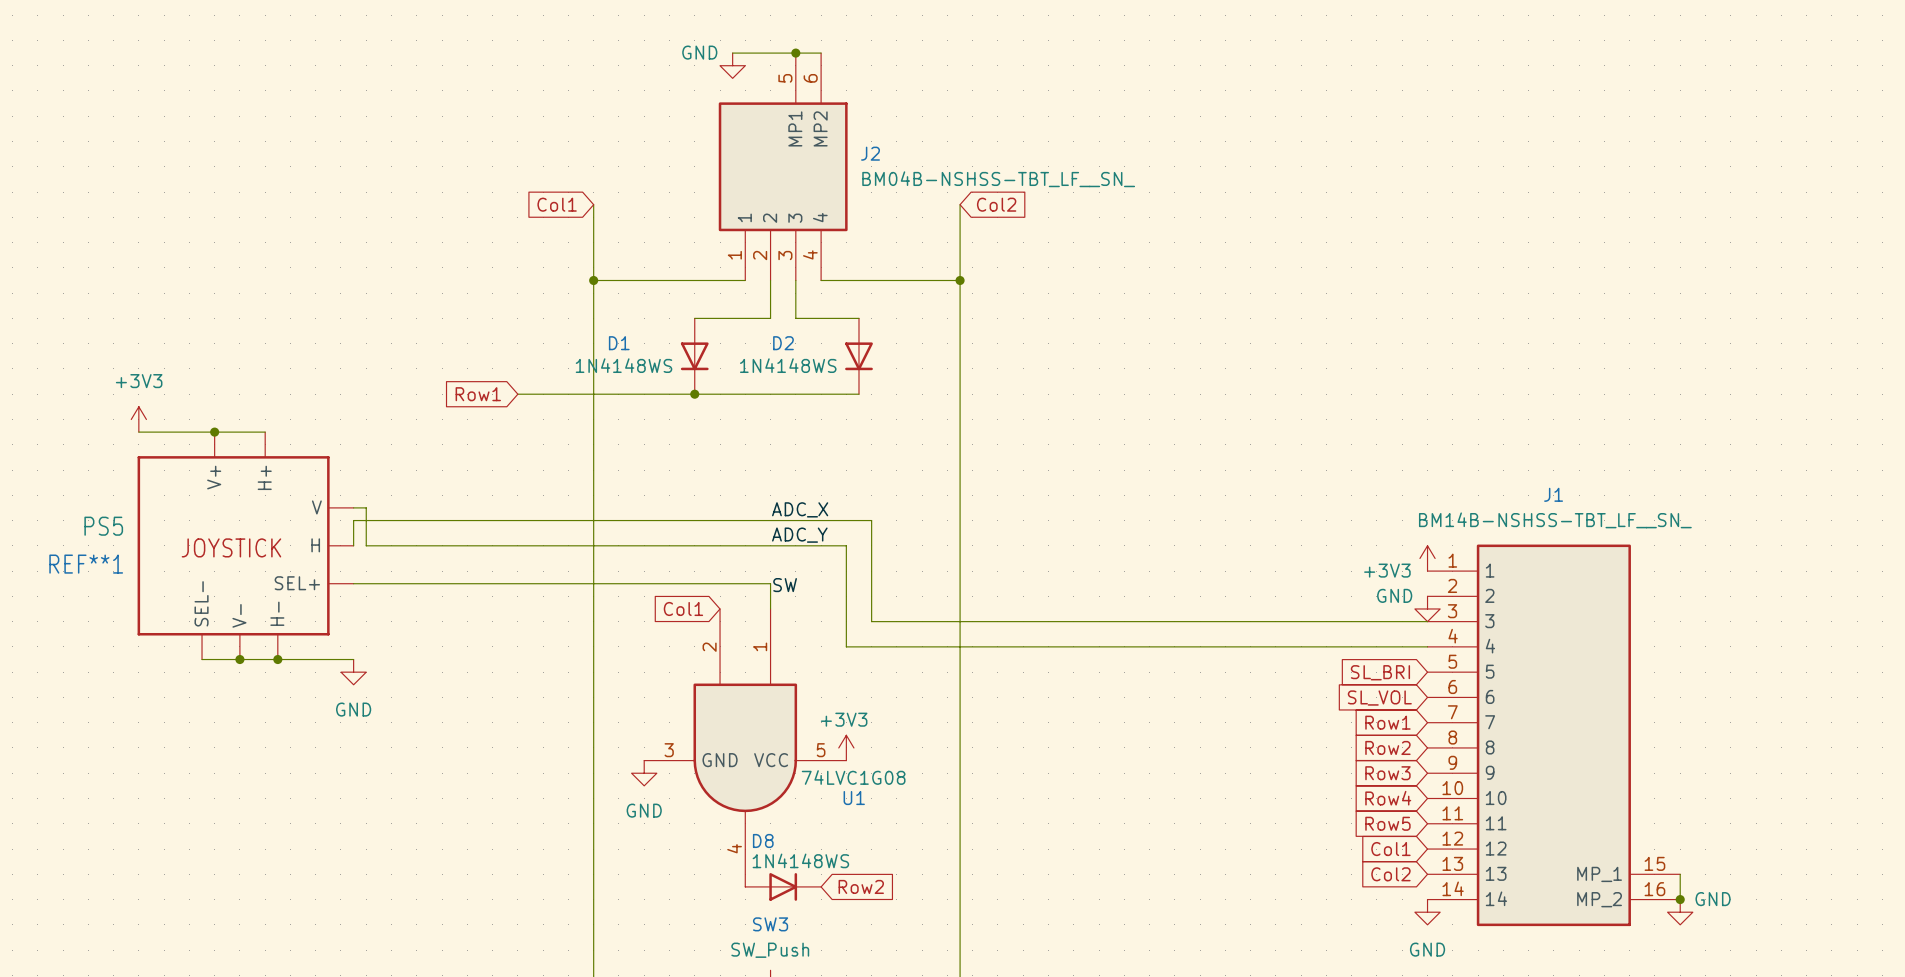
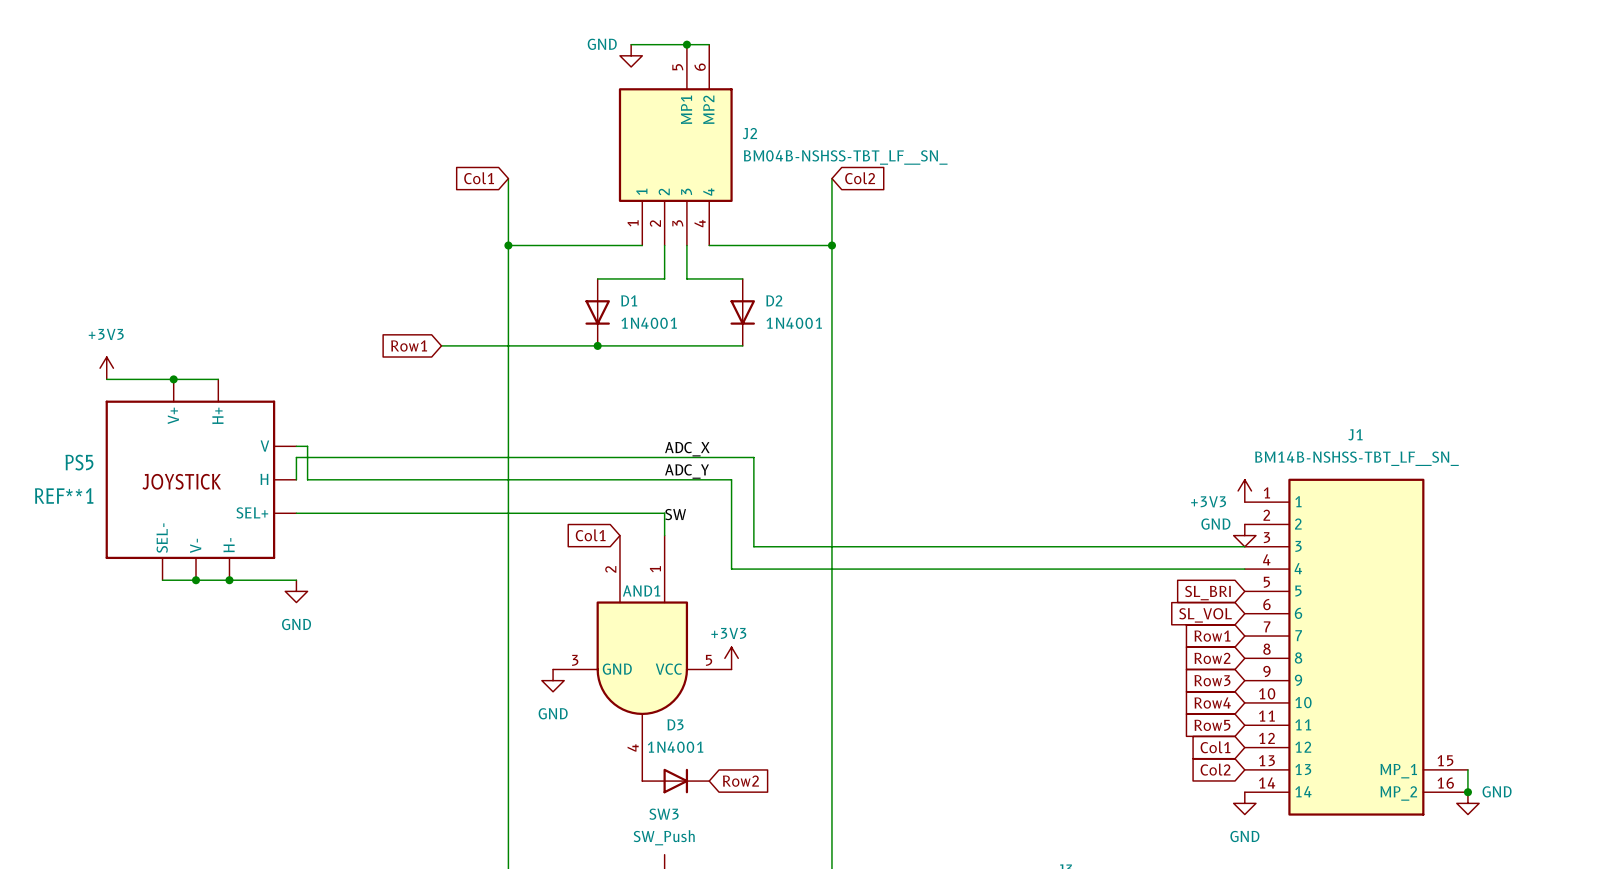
D1 name position: D1 (619, 343) -> D1 (629, 300)
D2 name position: D2 (783, 343) -> D2 (774, 300)
D1 value: 1N4148WS (623, 365) -> 1N4001 (649, 323)
D2 value: 1N4148WS (788, 365) -> 1N4001 (794, 323)
U1 value: 74LVC1G08 (853, 777) -> none
U1 name: U1 (854, 798) -> AND1 (641, 590)
D8 name: D8 (763, 840) -> D3 (675, 724)
D8 value: 1N4148WS (800, 860) -> 1N4001 (675, 747)

